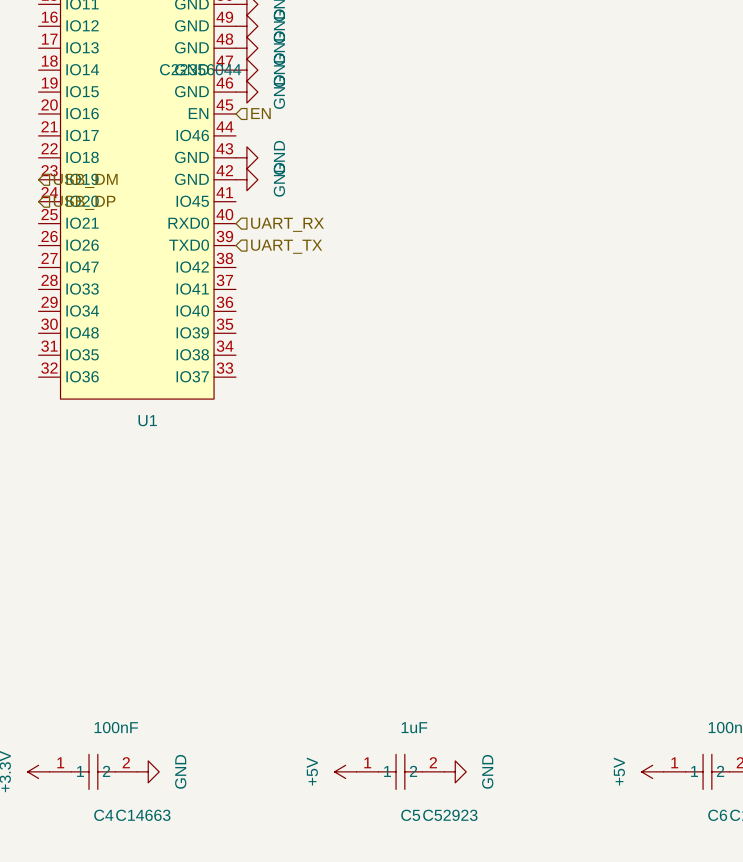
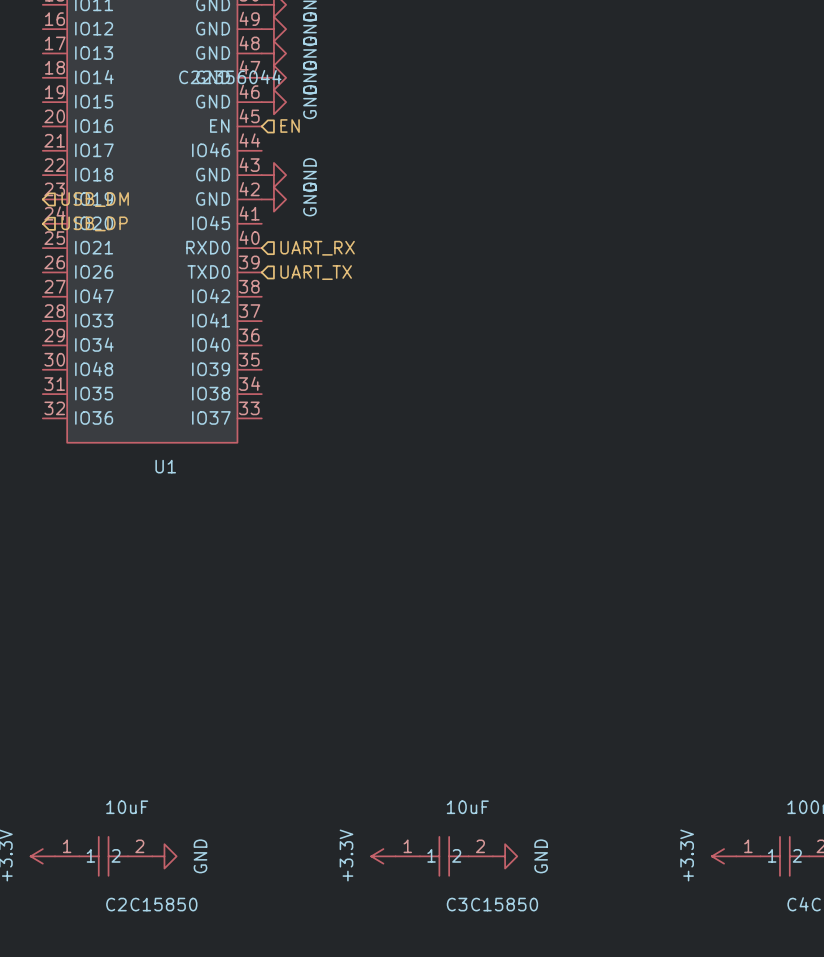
C4 value: 100nF (116, 727) -> 10uF (127, 807)
C5 value: 1uF (414, 727) -> 10uF (467, 807)
power symbol: +5V (345, 771) -> +3.3V (383, 856)
power symbol: +5V (652, 771) -> +3.3V (724, 856)
C4 name: C4 (103, 815) -> C2 (116, 904)
C4 text: C14663 (143, 815) -> C15850 (163, 904)
C5 name: C5 (410, 815) -> C3 (457, 904)
C5 text: C52923 (450, 815) -> C15850 (504, 904)
C6 name: C6 (717, 815) -> C4 (798, 904)

